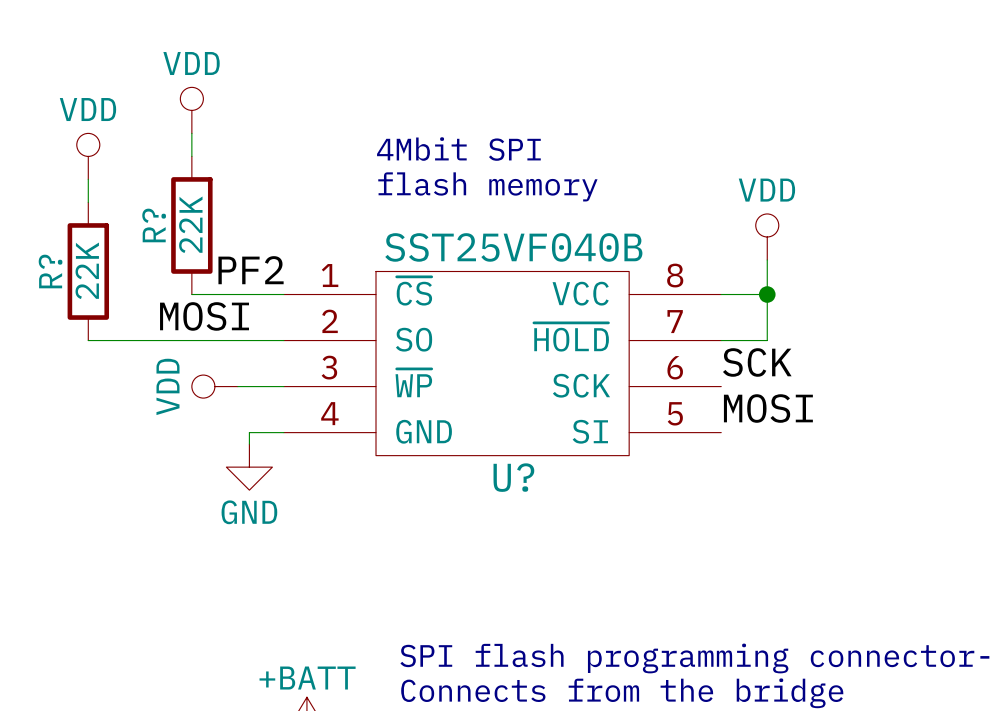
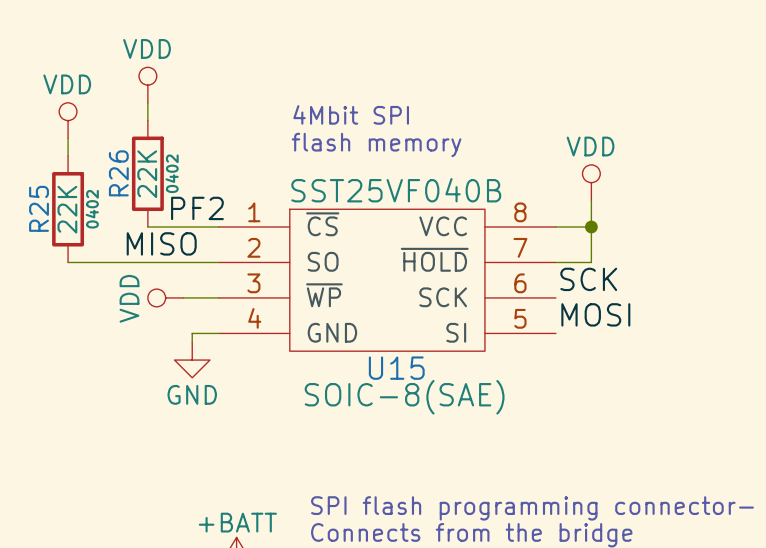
R? name: R? (154, 225) -> R26 (118, 173)
R? text: none -> 0402 (172, 173)
R? name: R? (50, 271) -> R25 (39, 208)
R? text: none -> 0402 (92, 209)
label: MOSI (204, 316) -> MISO (161, 243)
U? name: U? (513, 477) -> U15 (396, 368)
U? text: none -> SOIC-8(SAE) (404, 397)

